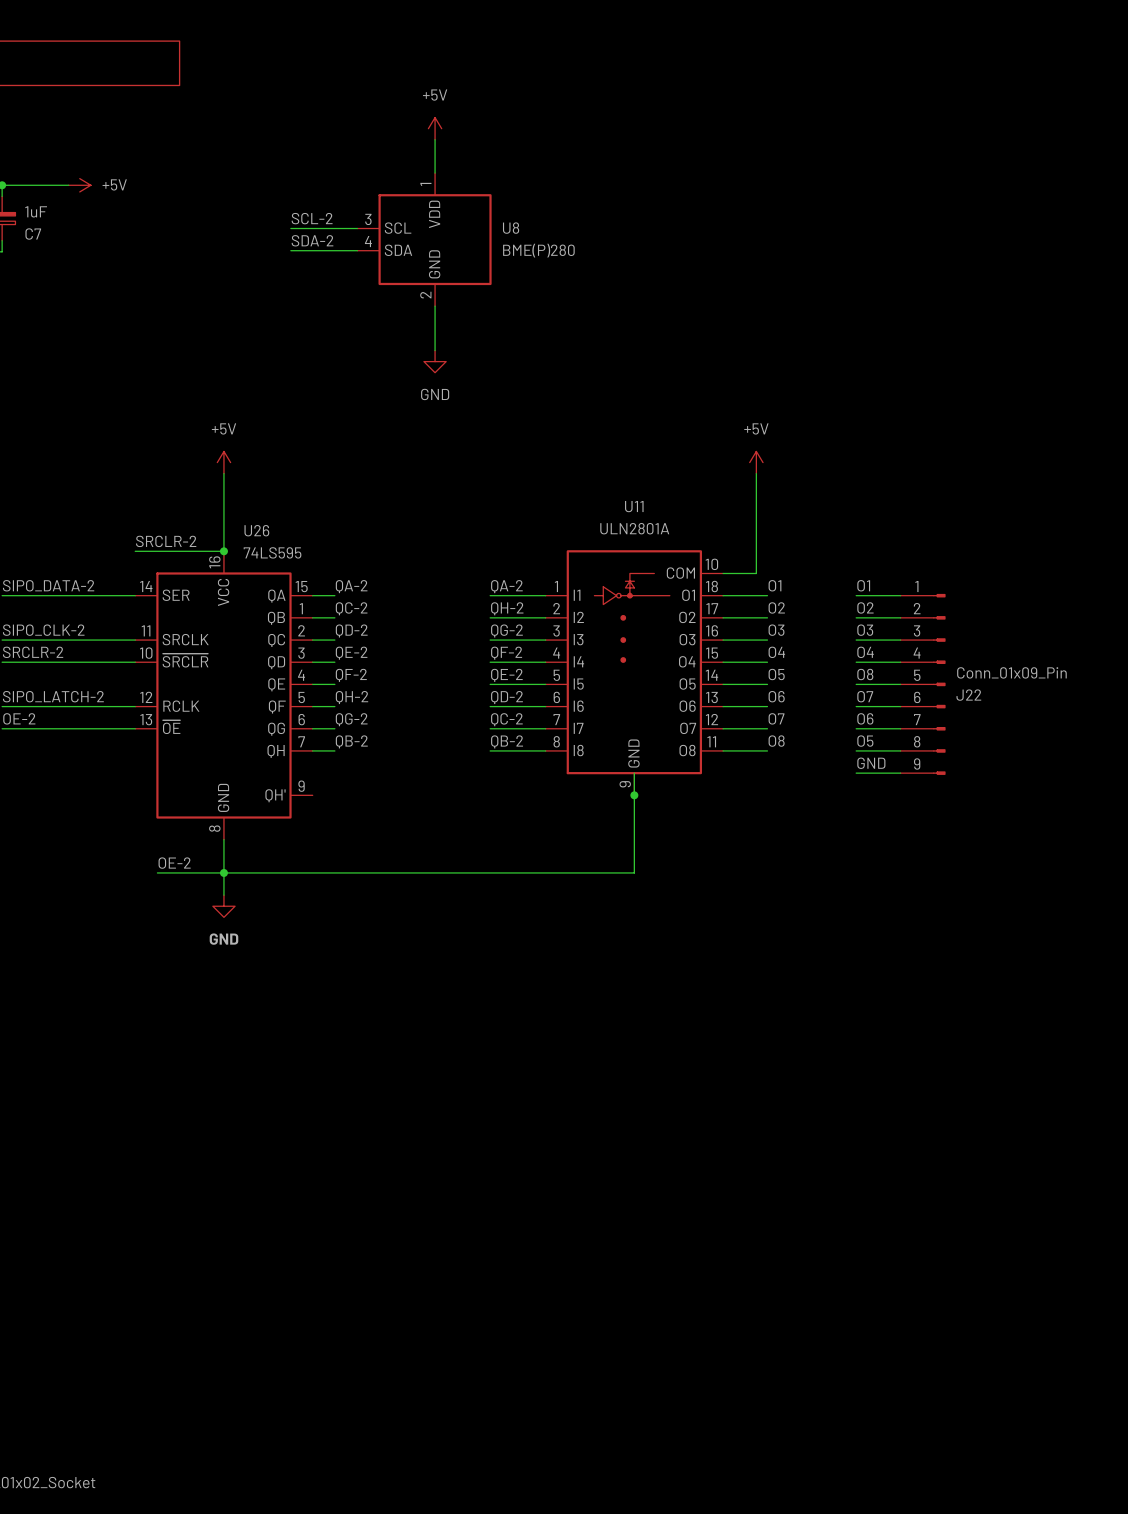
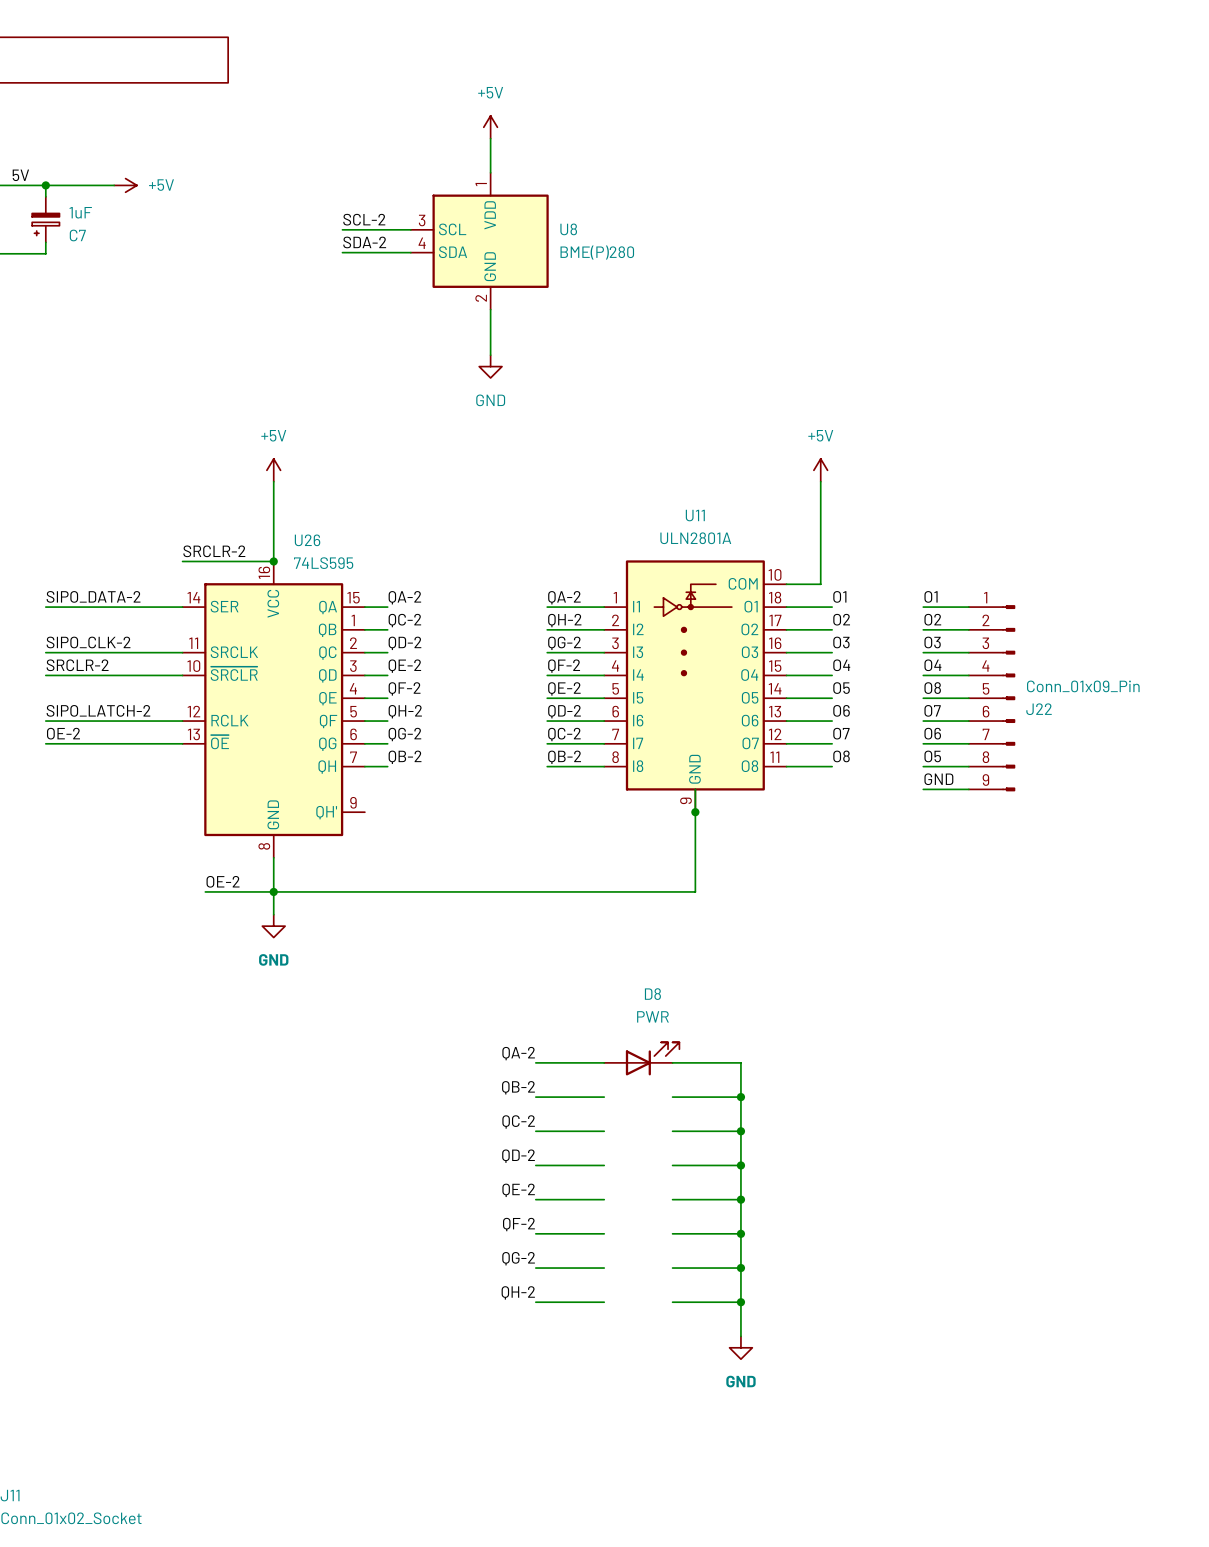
label: none -> QA-2 (518, 1053)
D8: none -> PWR (641, 1058)
wire: none -> (535, 1062) (604, 1062)
wire: none -> (672, 1062) (740, 1062) (740, 1336)
label: none -> QB-2 (518, 1087)
wire: none -> (535, 1097) (604, 1097)
wire: none -> (672, 1097) (740, 1097)
junction: none -> (740, 1097)
label: none -> QC-2 (518, 1121)
wire: none -> (535, 1131) (604, 1131)
wire: none -> (672, 1131) (740, 1131)
junction: none -> (740, 1131)
label: none -> QD-2 (518, 1156)
wire: none -> (535, 1165) (604, 1165)
wire: none -> (672, 1165) (740, 1165)
junction: none -> (740, 1165)
label: none -> QE-2 (518, 1190)
wire: none -> (535, 1199) (604, 1199)
wire: none -> (672, 1199) (740, 1199)
junction: none -> (740, 1199)
label: none -> QF-2 (518, 1224)
wire: none -> (535, 1233) (604, 1233)
wire: none -> (672, 1233) (740, 1233)
junction: none -> (740, 1233)
label: none -> QG-2 (518, 1258)
wire: none -> (535, 1268) (604, 1268)
wire: none -> (672, 1268) (740, 1268)
junction: none -> (740, 1268)
label: none -> QH-2 (518, 1292)
wire: none -> (535, 1302) (604, 1302)
wire: none -> (672, 1302) (740, 1302)
junction: none -> (740, 1302)
power symbol: none -> GND (740, 1347)

